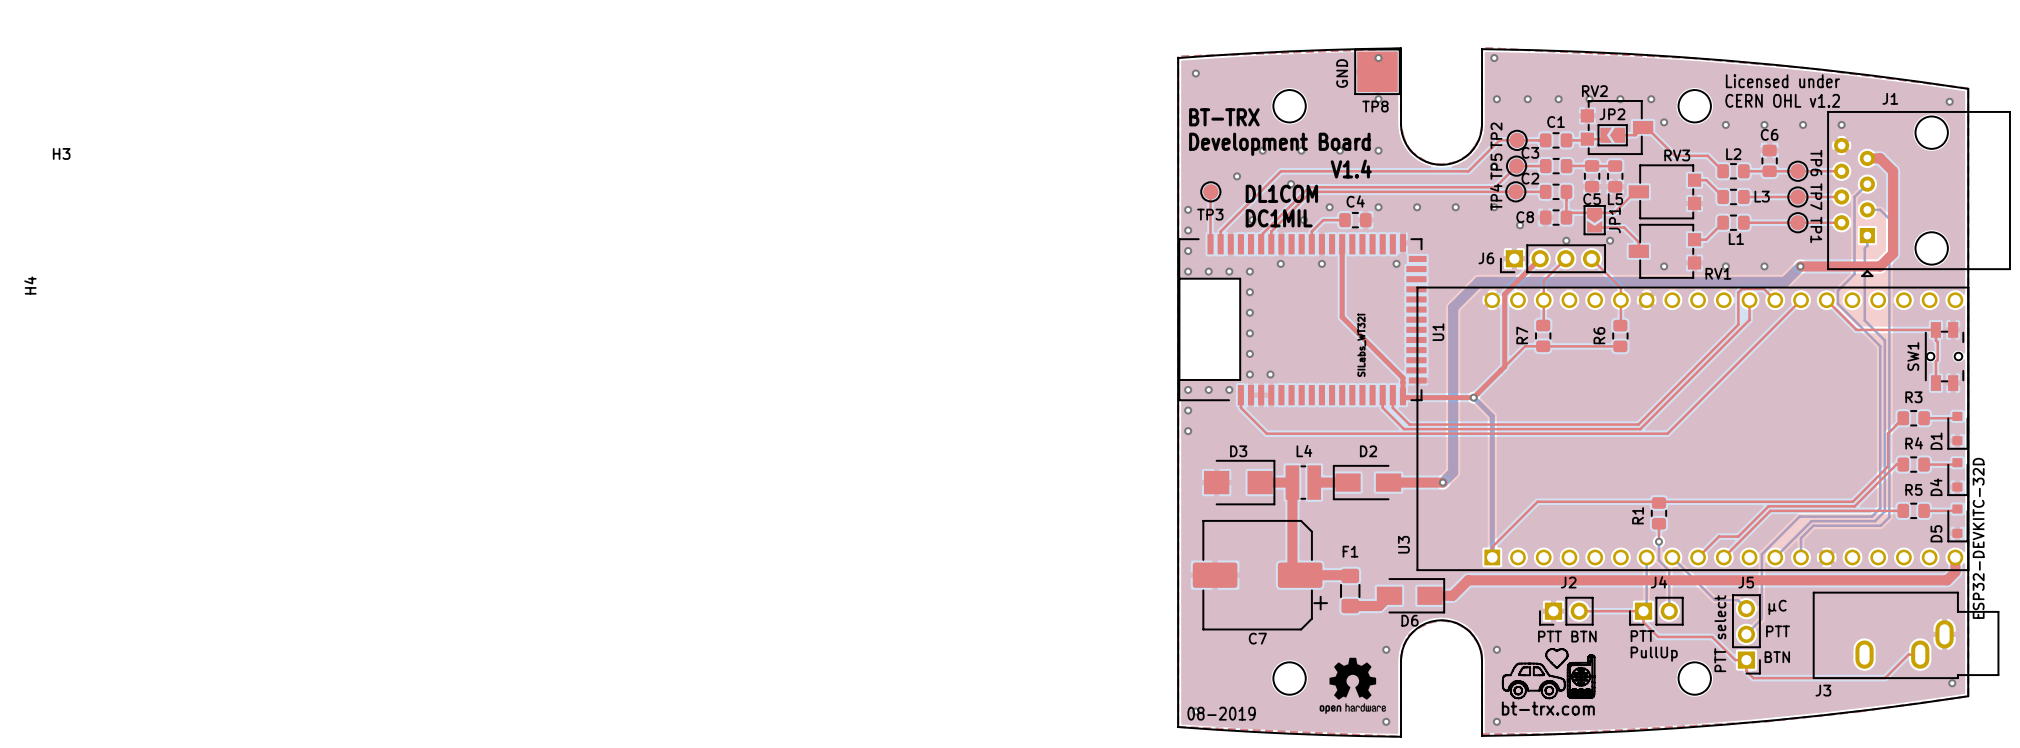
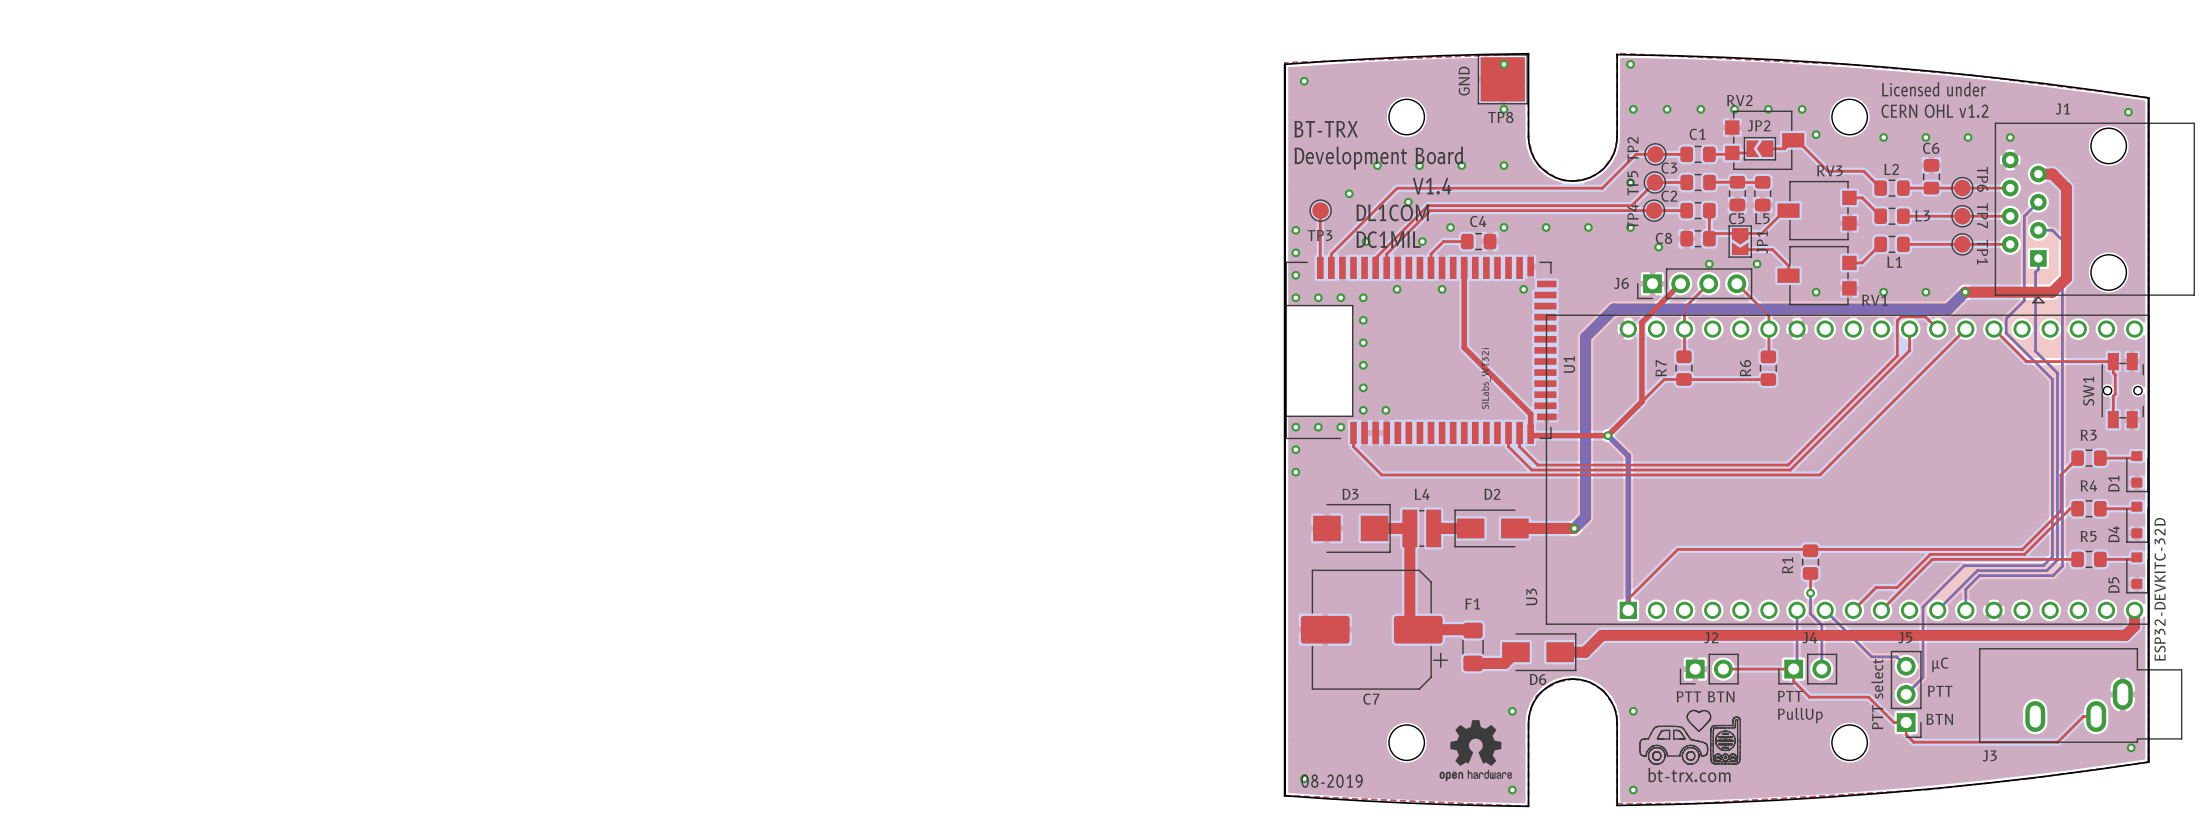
H3 name: H3 (61, 153) -> none
H4 name: H4 (30, 285) -> none

